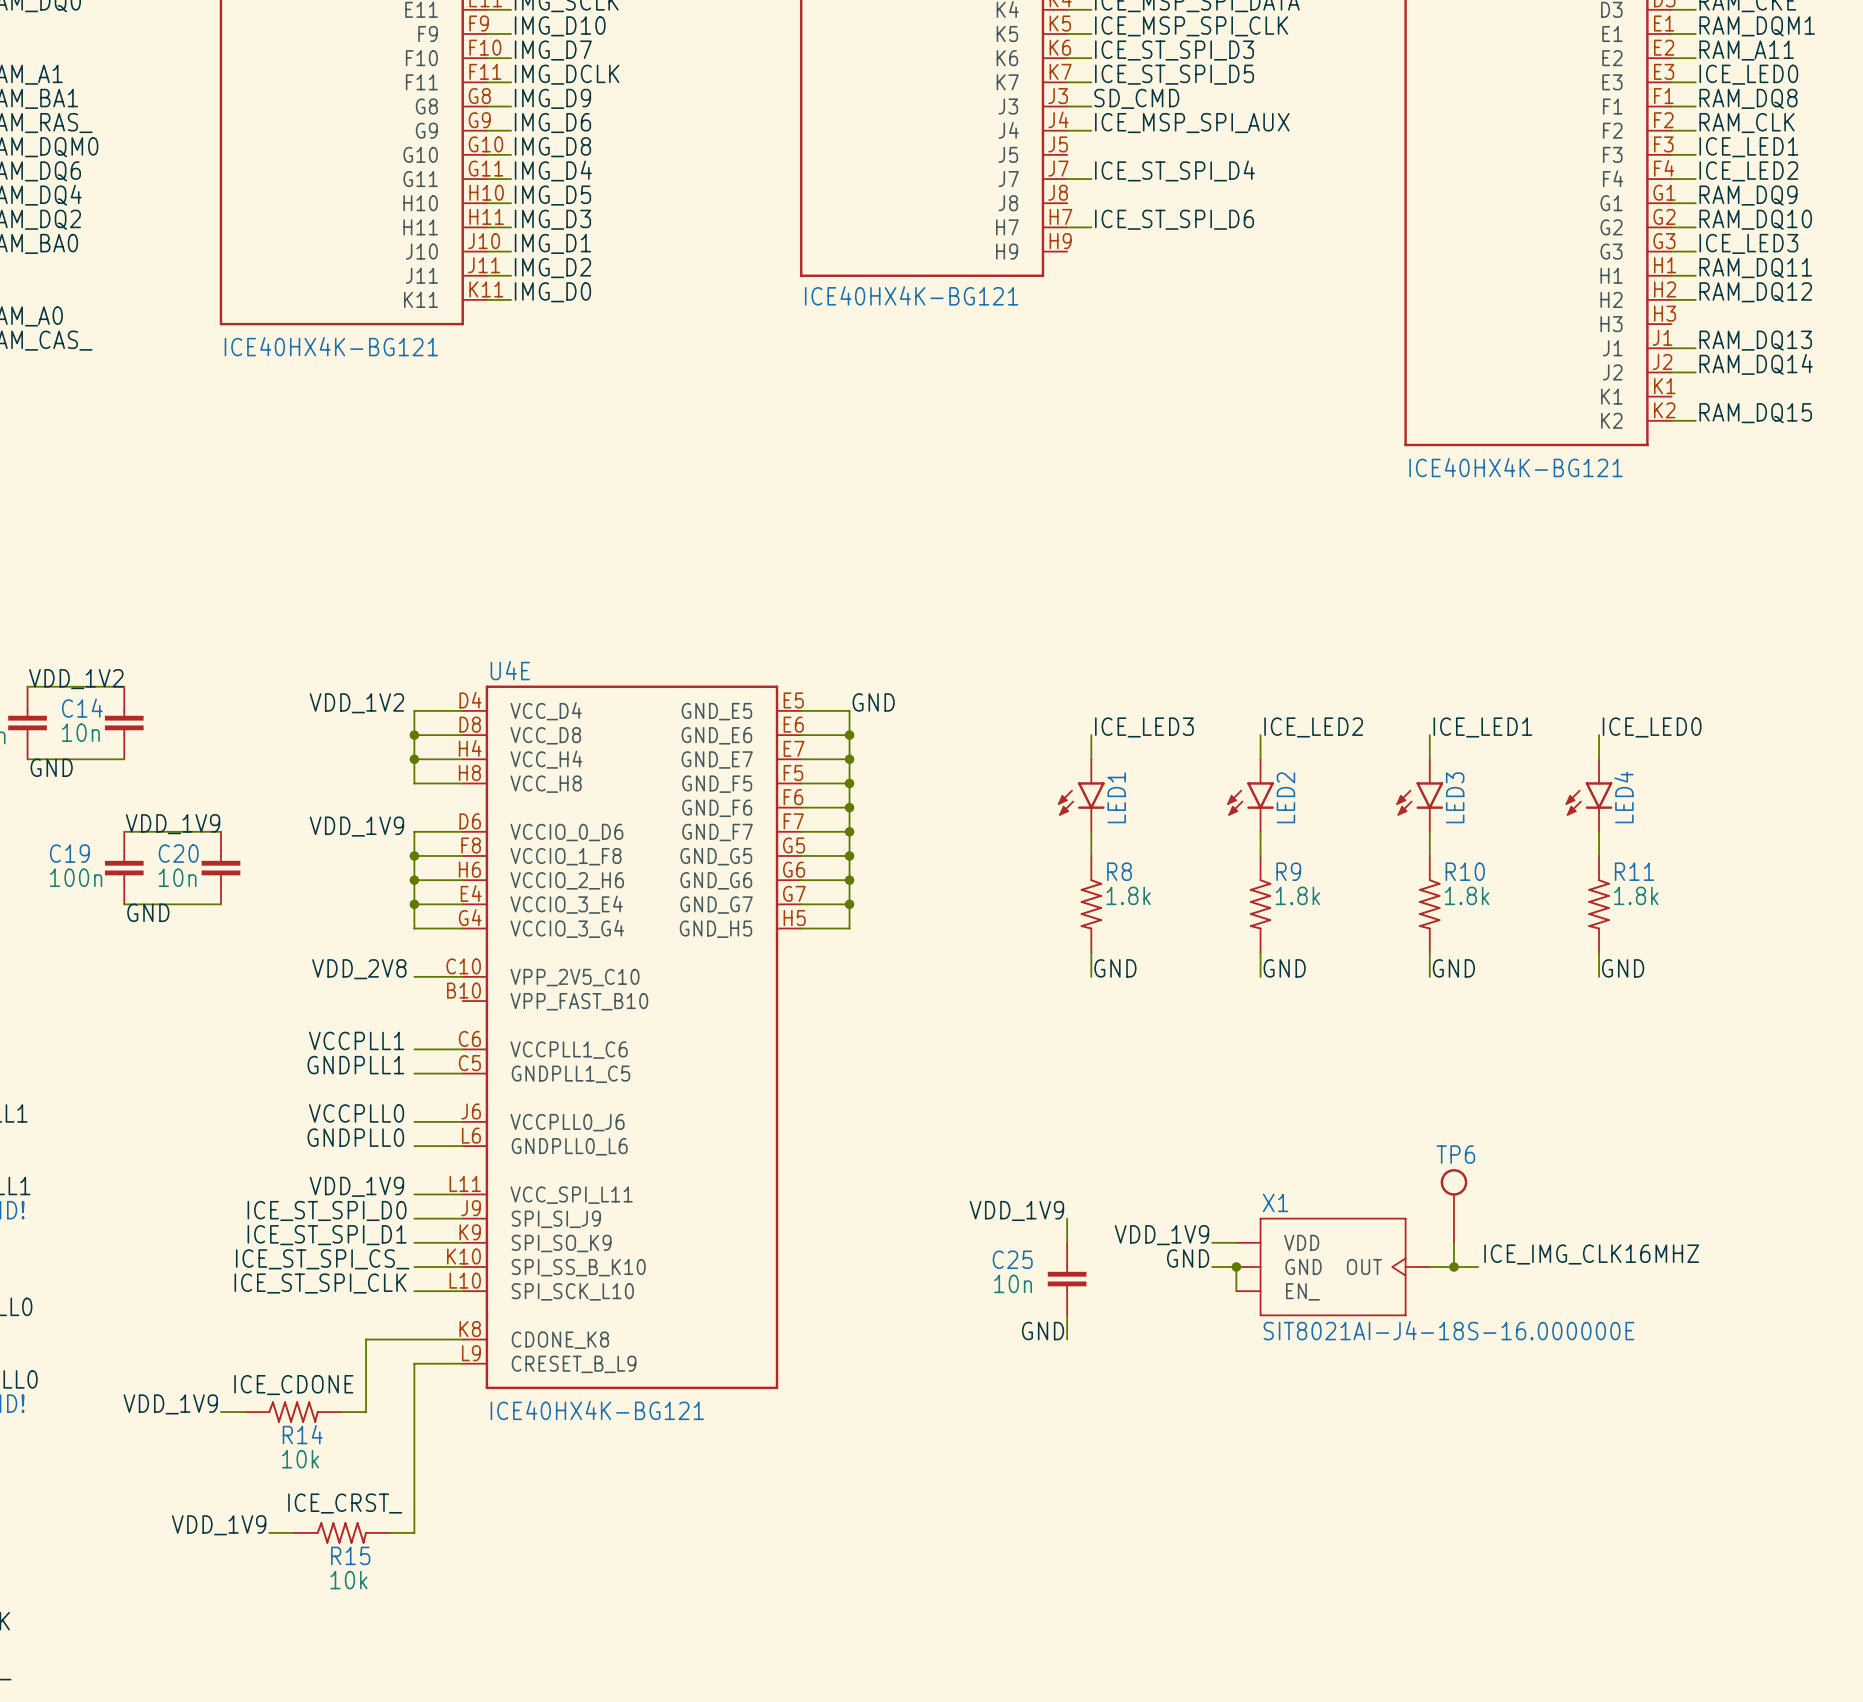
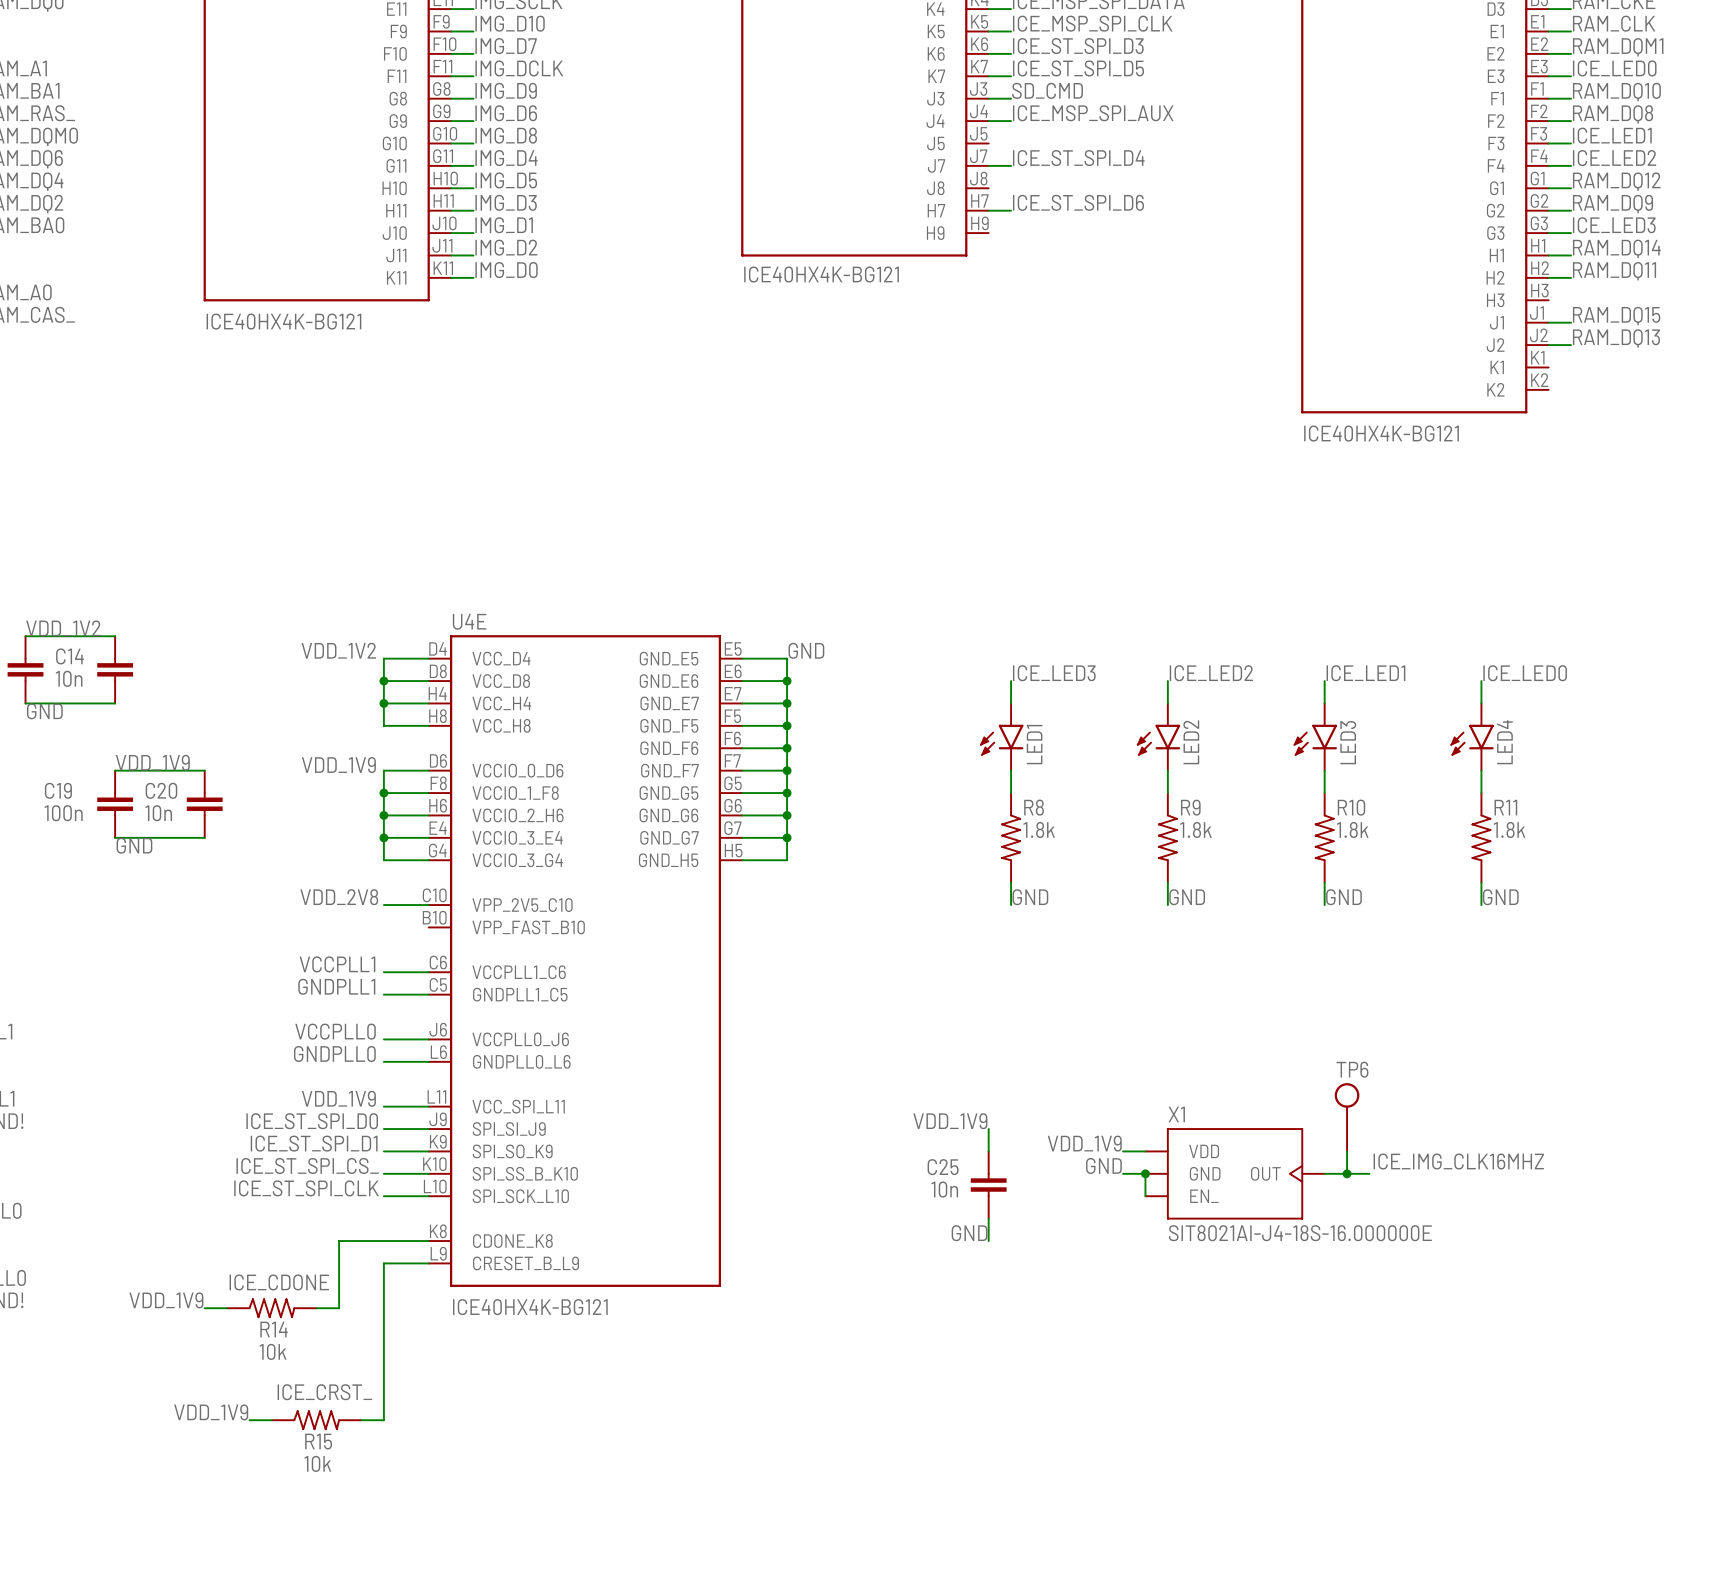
label: RAM_DQM1 (1757, 26) -> RAM_CLK (1614, 23)
label: RAM_A11 (1746, 50) -> RAM_DQM1 (1618, 47)
label: RAM_DQ8 (1748, 98) -> RAM_DQ10 (1616, 92)
label: RAM_CLK (1747, 123) -> RAM_DQ8 (1613, 114)
label: RAM_DQ9 (1748, 195) -> RAM_DQ12 (1616, 181)
label: RAM_DQ10 (1755, 219) -> RAM_DQ9 (1612, 204)
label: RAM_DQ11 (1755, 268) -> RAM_DQ14 (1616, 248)
label: RAM_DQ12 (1755, 292) -> RAM_DQ11 (1614, 271)
label: RAM_DQ13 (1755, 340) -> RAM_DQ15 (1616, 316)
label: RAM_DQ14 (1756, 364) -> RAM_DQ13 (1616, 338)
label: RAM_DQ15 (1755, 413) -> none
wire: (1671, 420) (1695, 420) -> none

